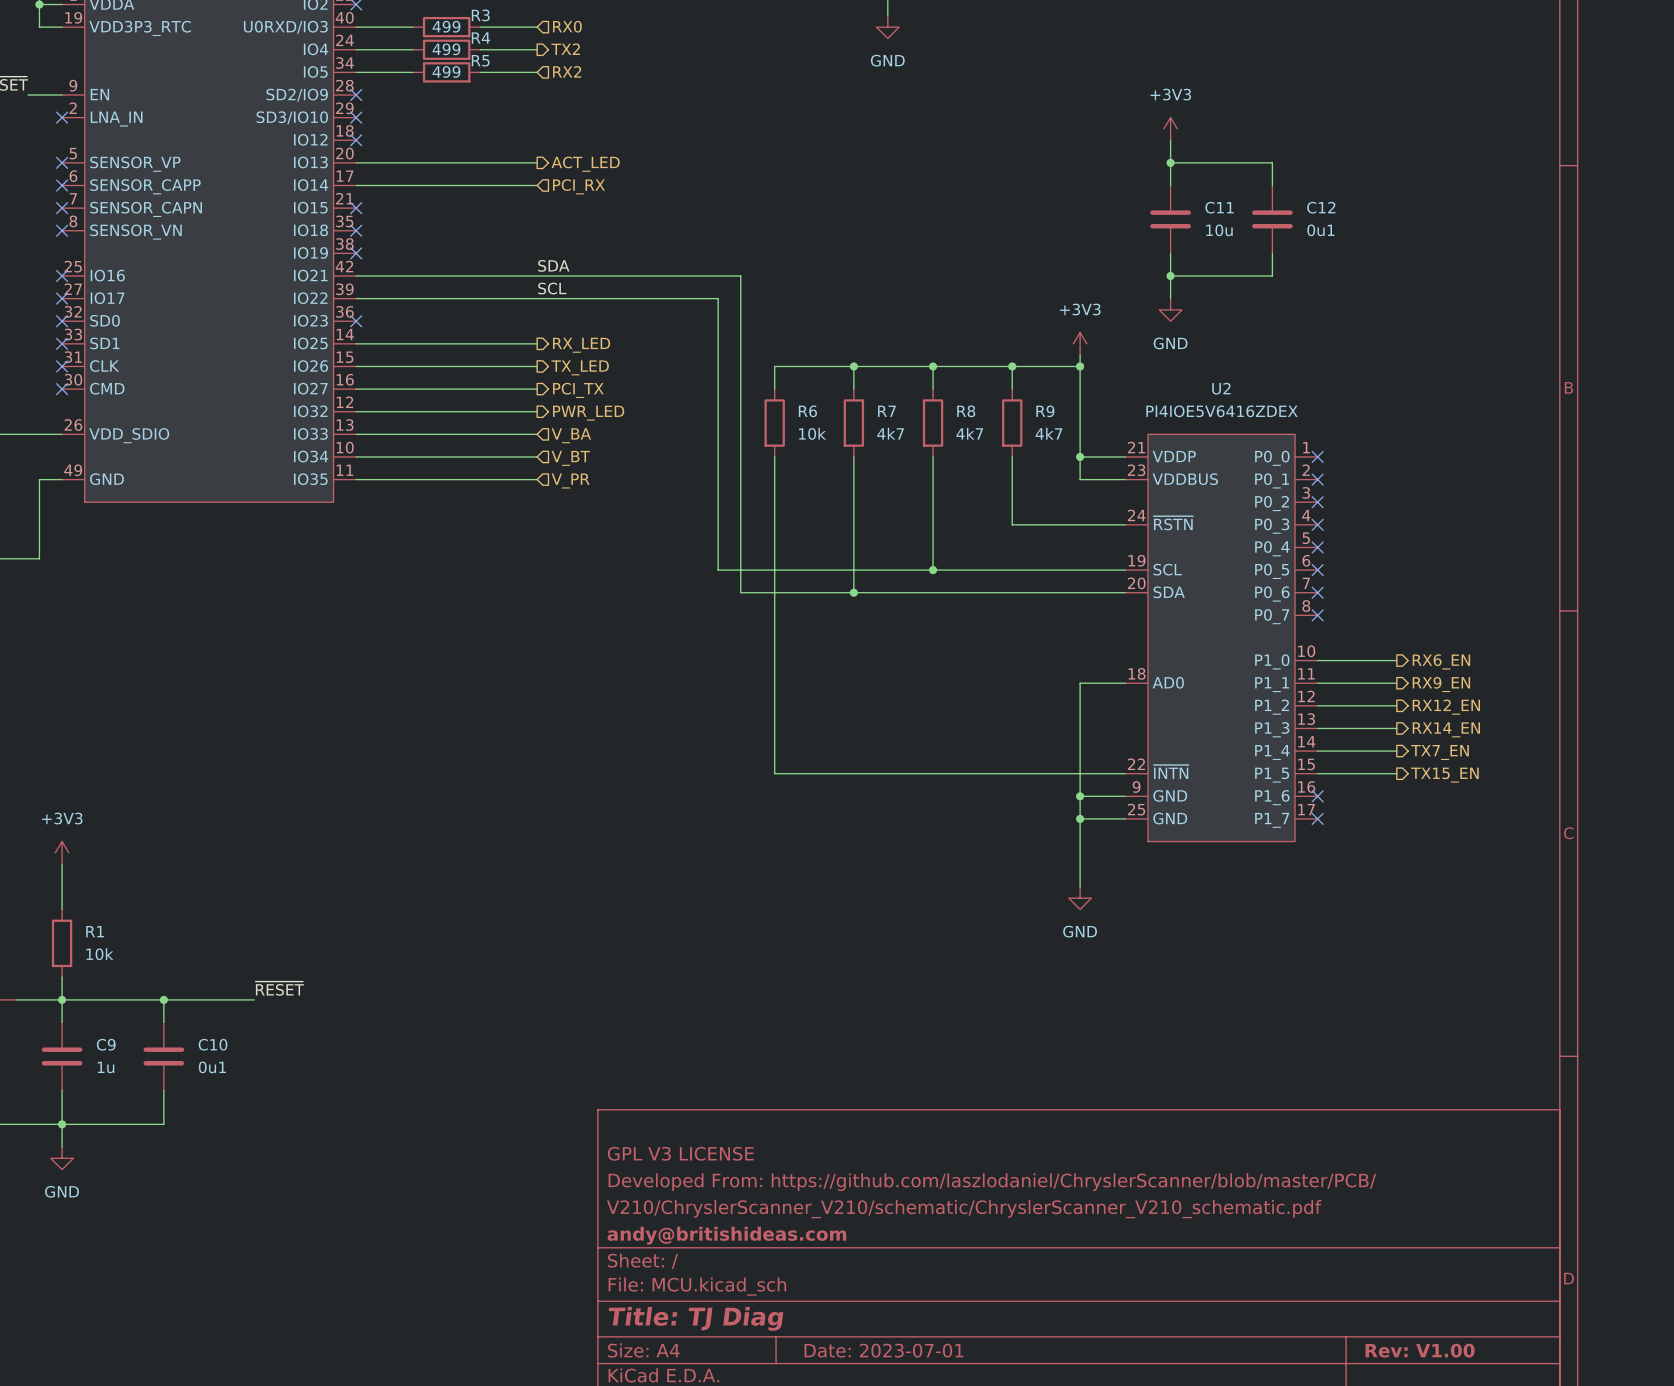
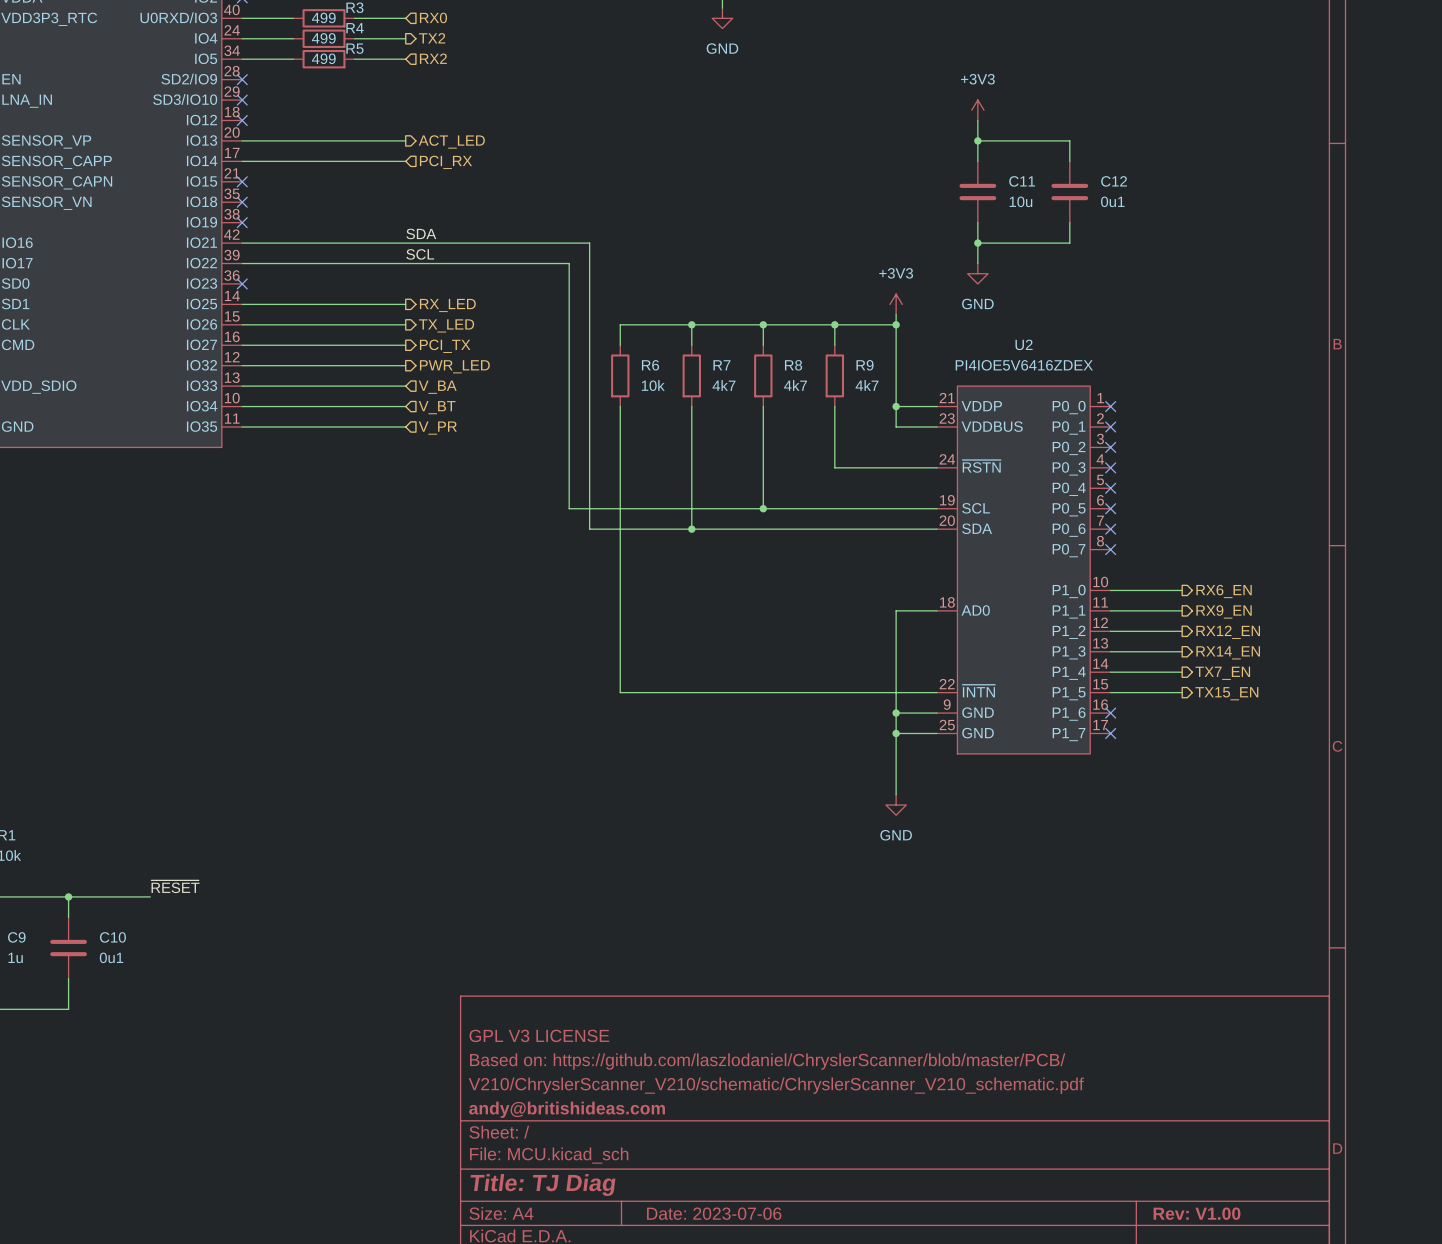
title block: Developed From: https://github.com/laszlodaniel/ChryslerScanner/blob/master/PCB/ (992, 1182) -> Based on: https://github.com/laszlodaniel/ChryslerScanner/blob/master/PCB/ (767, 1061)
title block: Date: 2023-07-01 (883, 1350) -> Date: 2023-07-06 (714, 1213)

